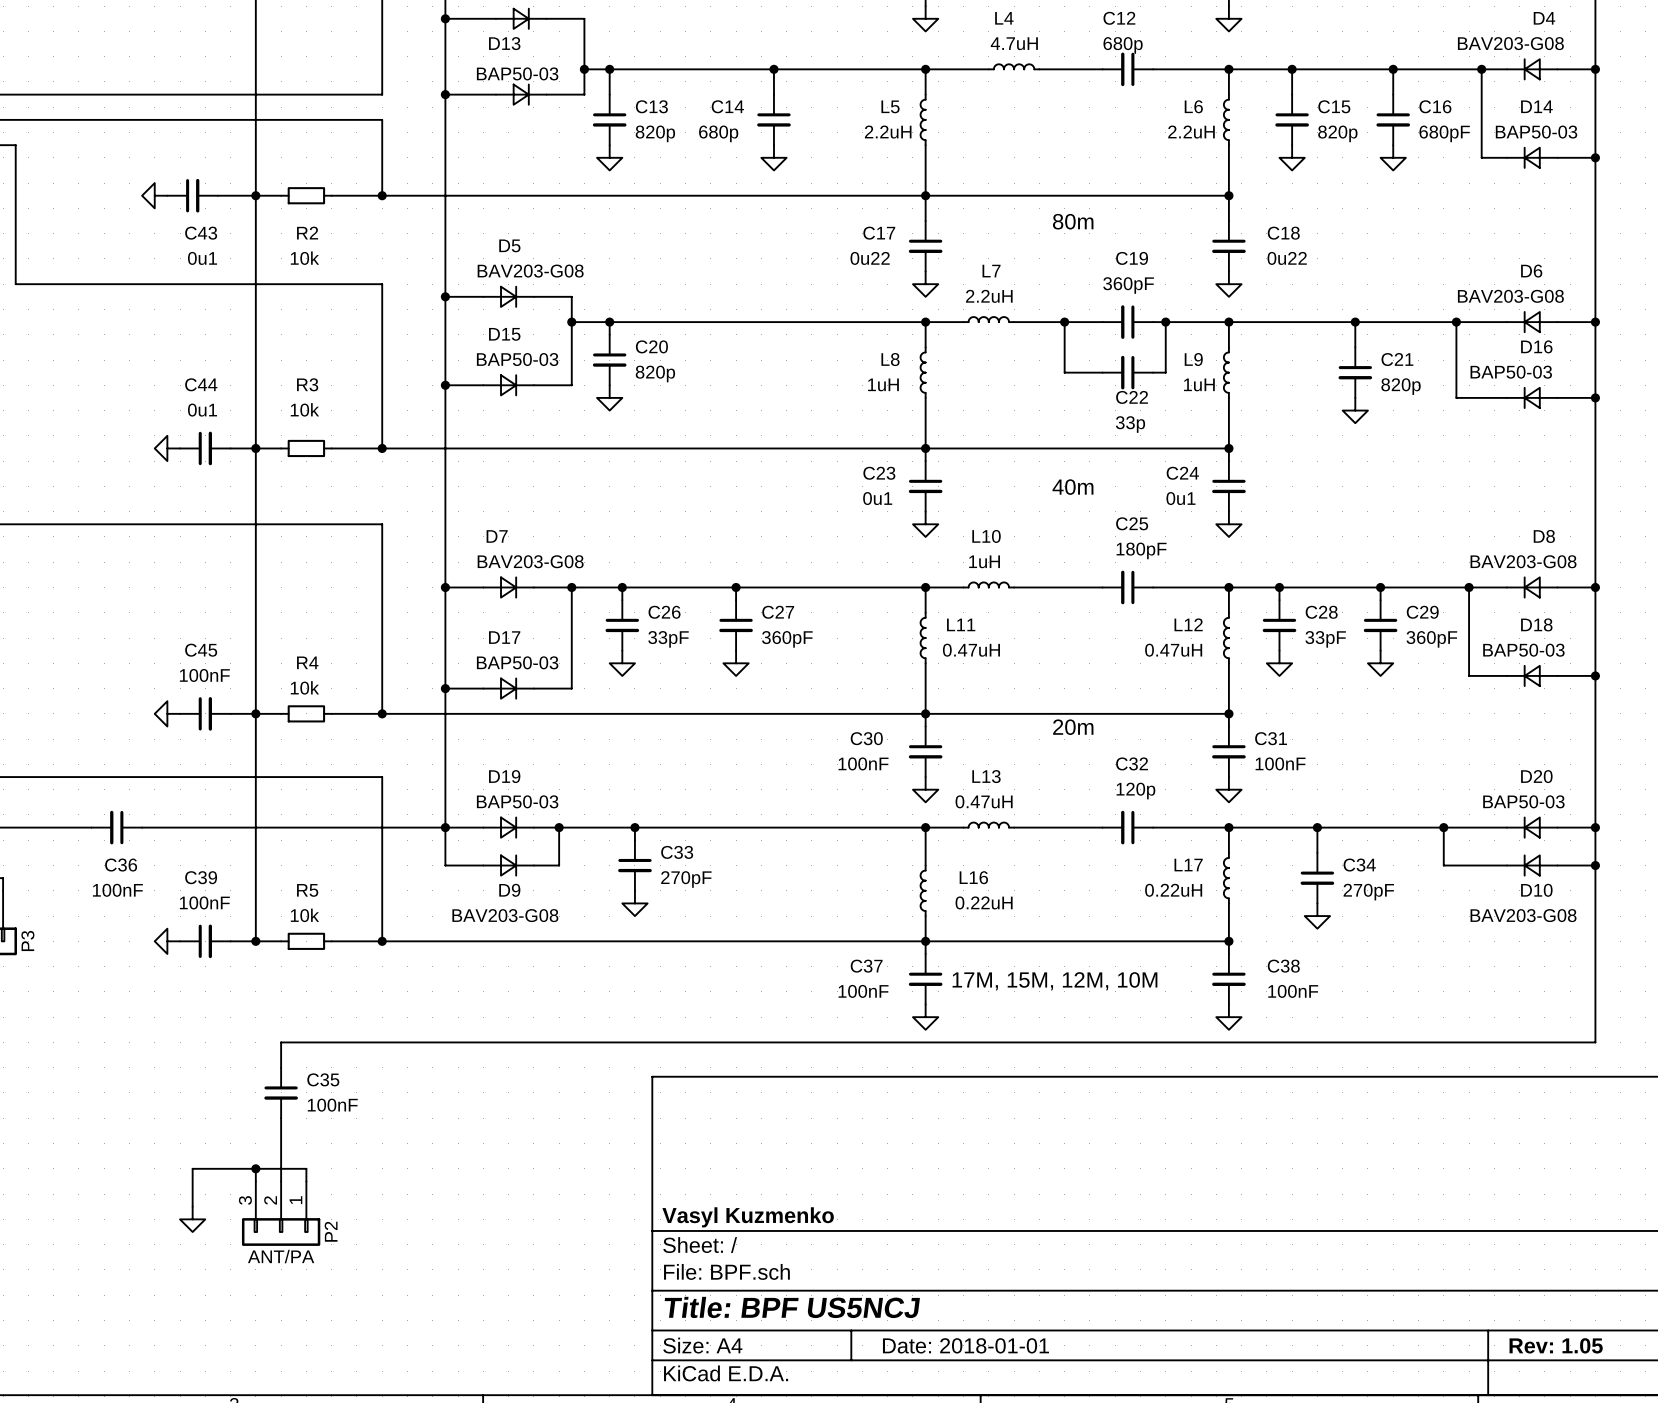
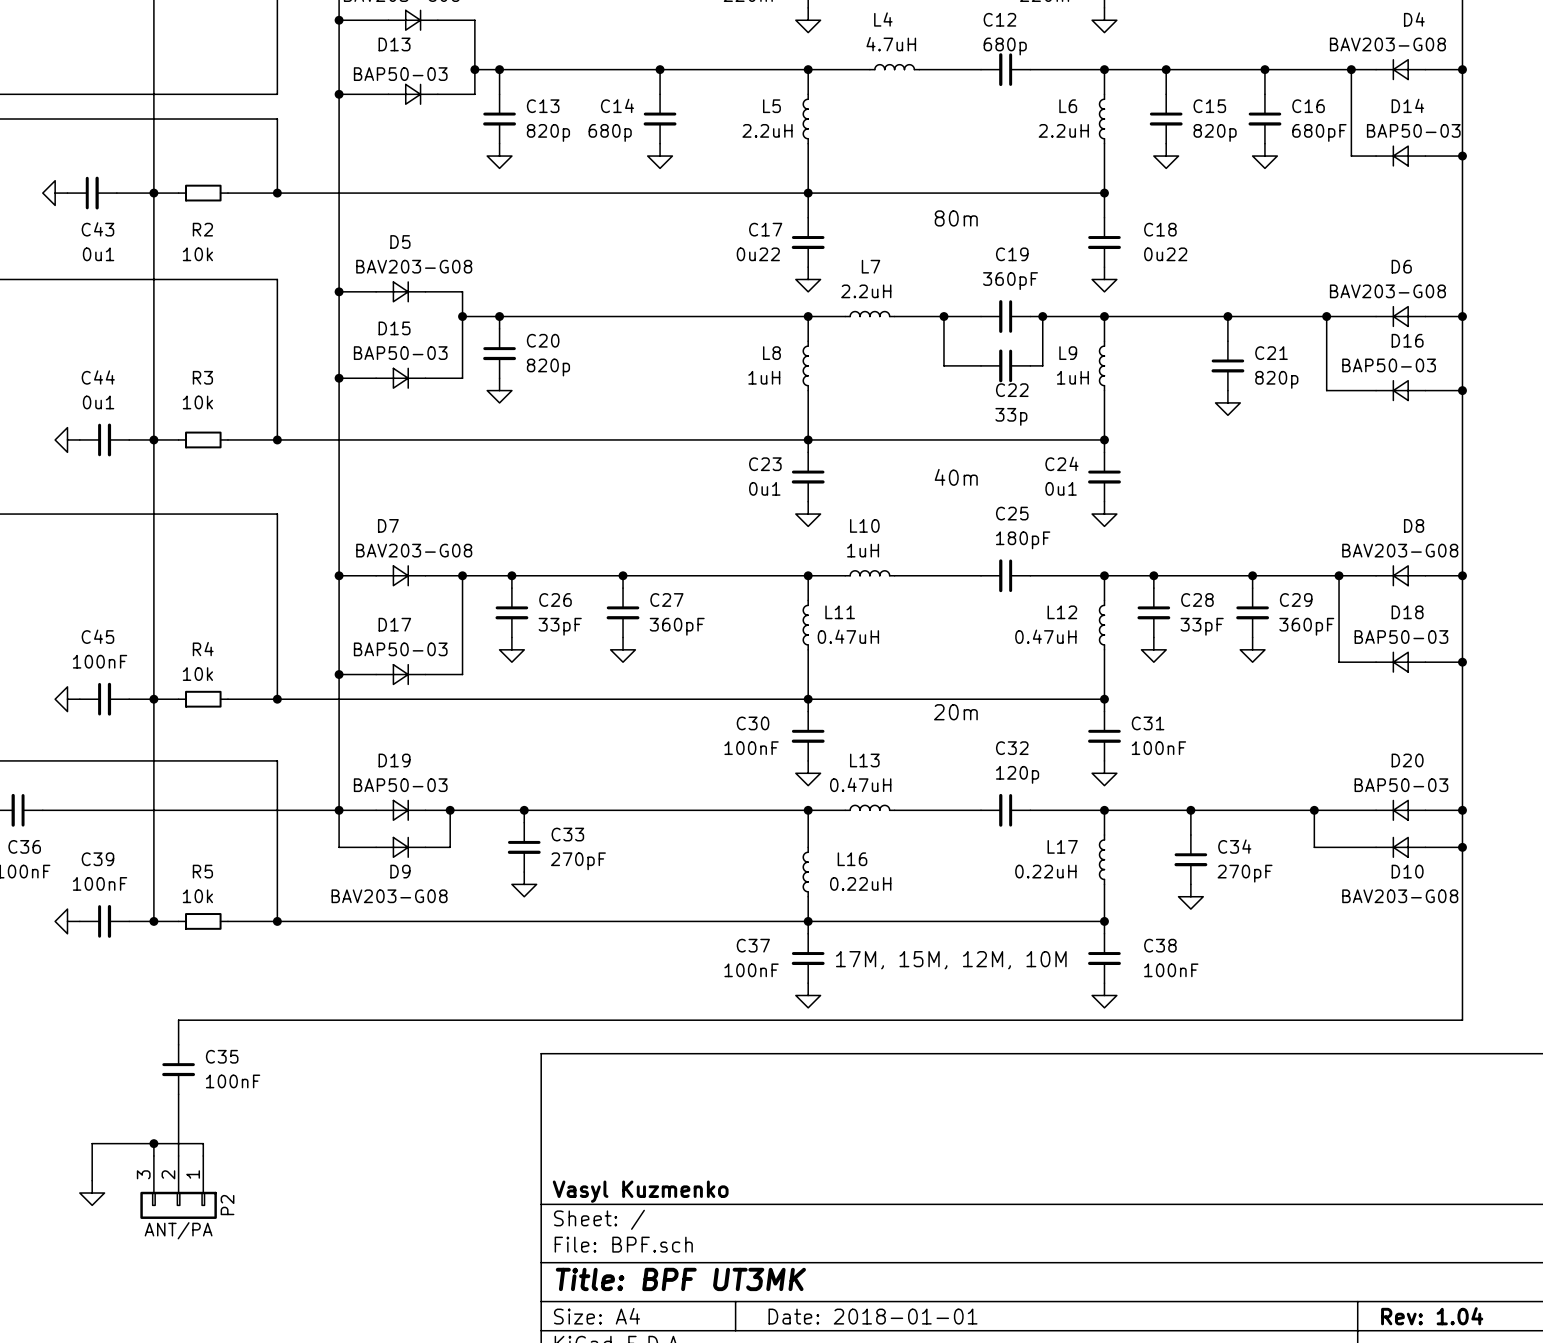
title block: Title: BPF US5NCJ (792, 1307) -> Title: BPF UT3MK (680, 1279)
title block: Rev: 1.05 (1556, 1345) -> Rev: 1.04 (1432, 1316)

